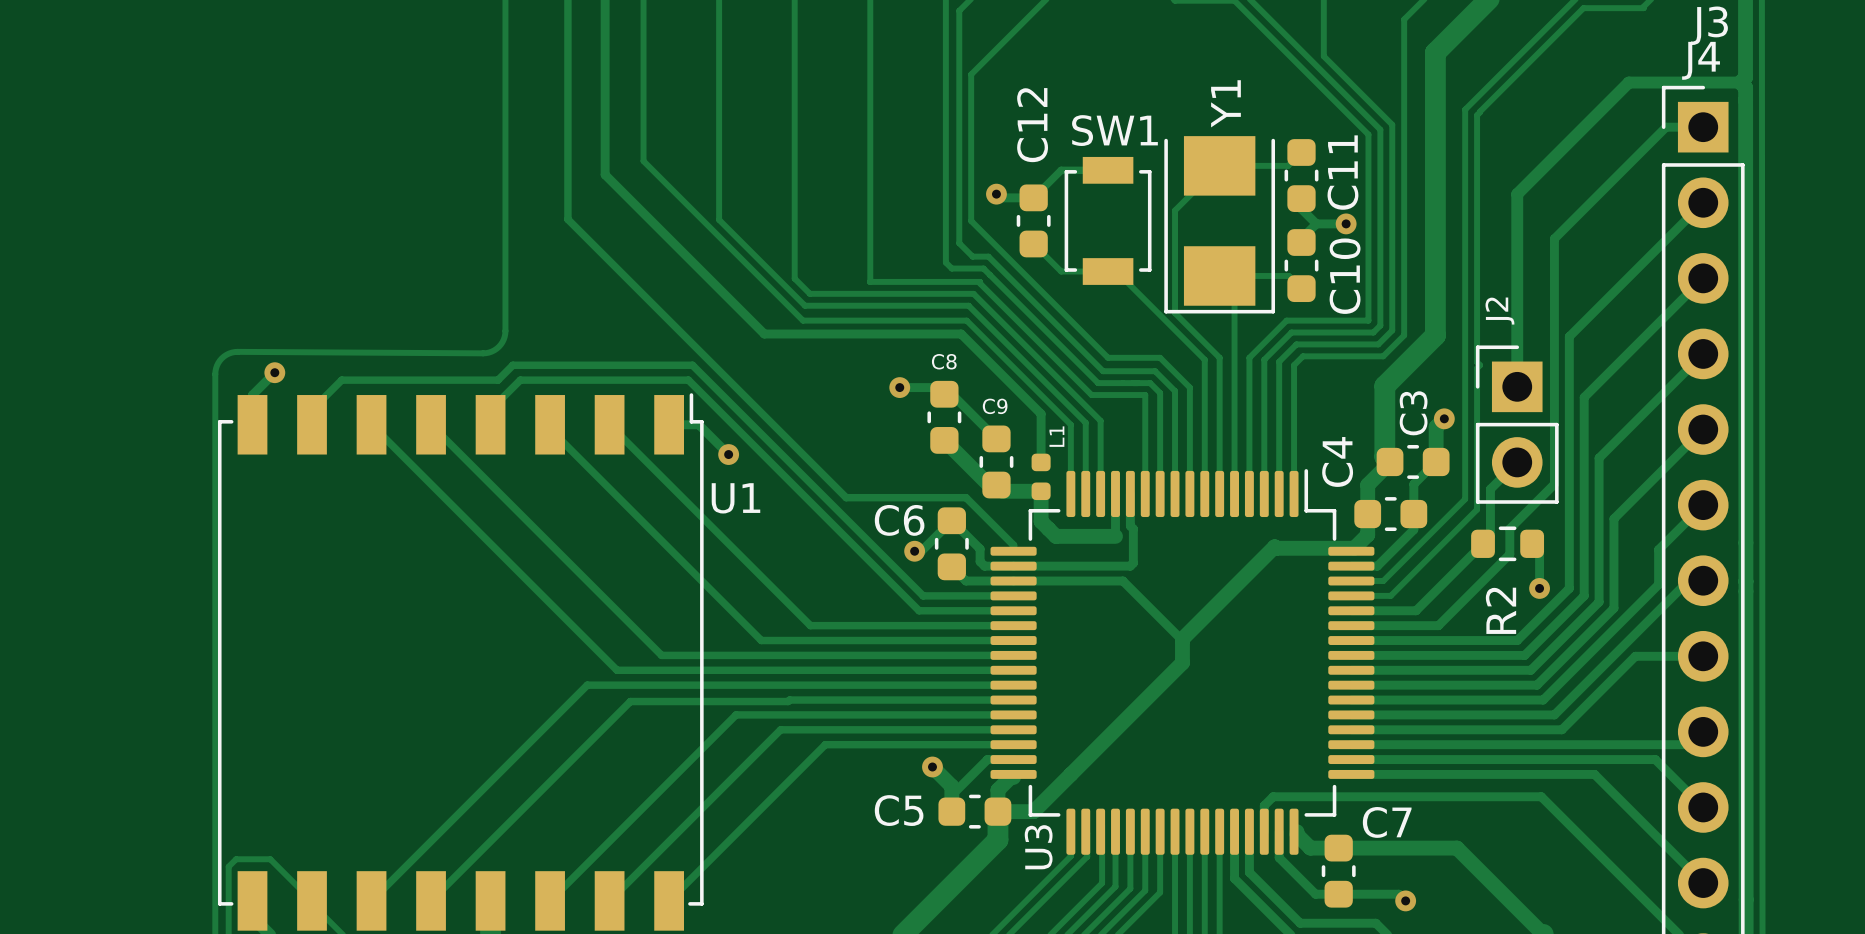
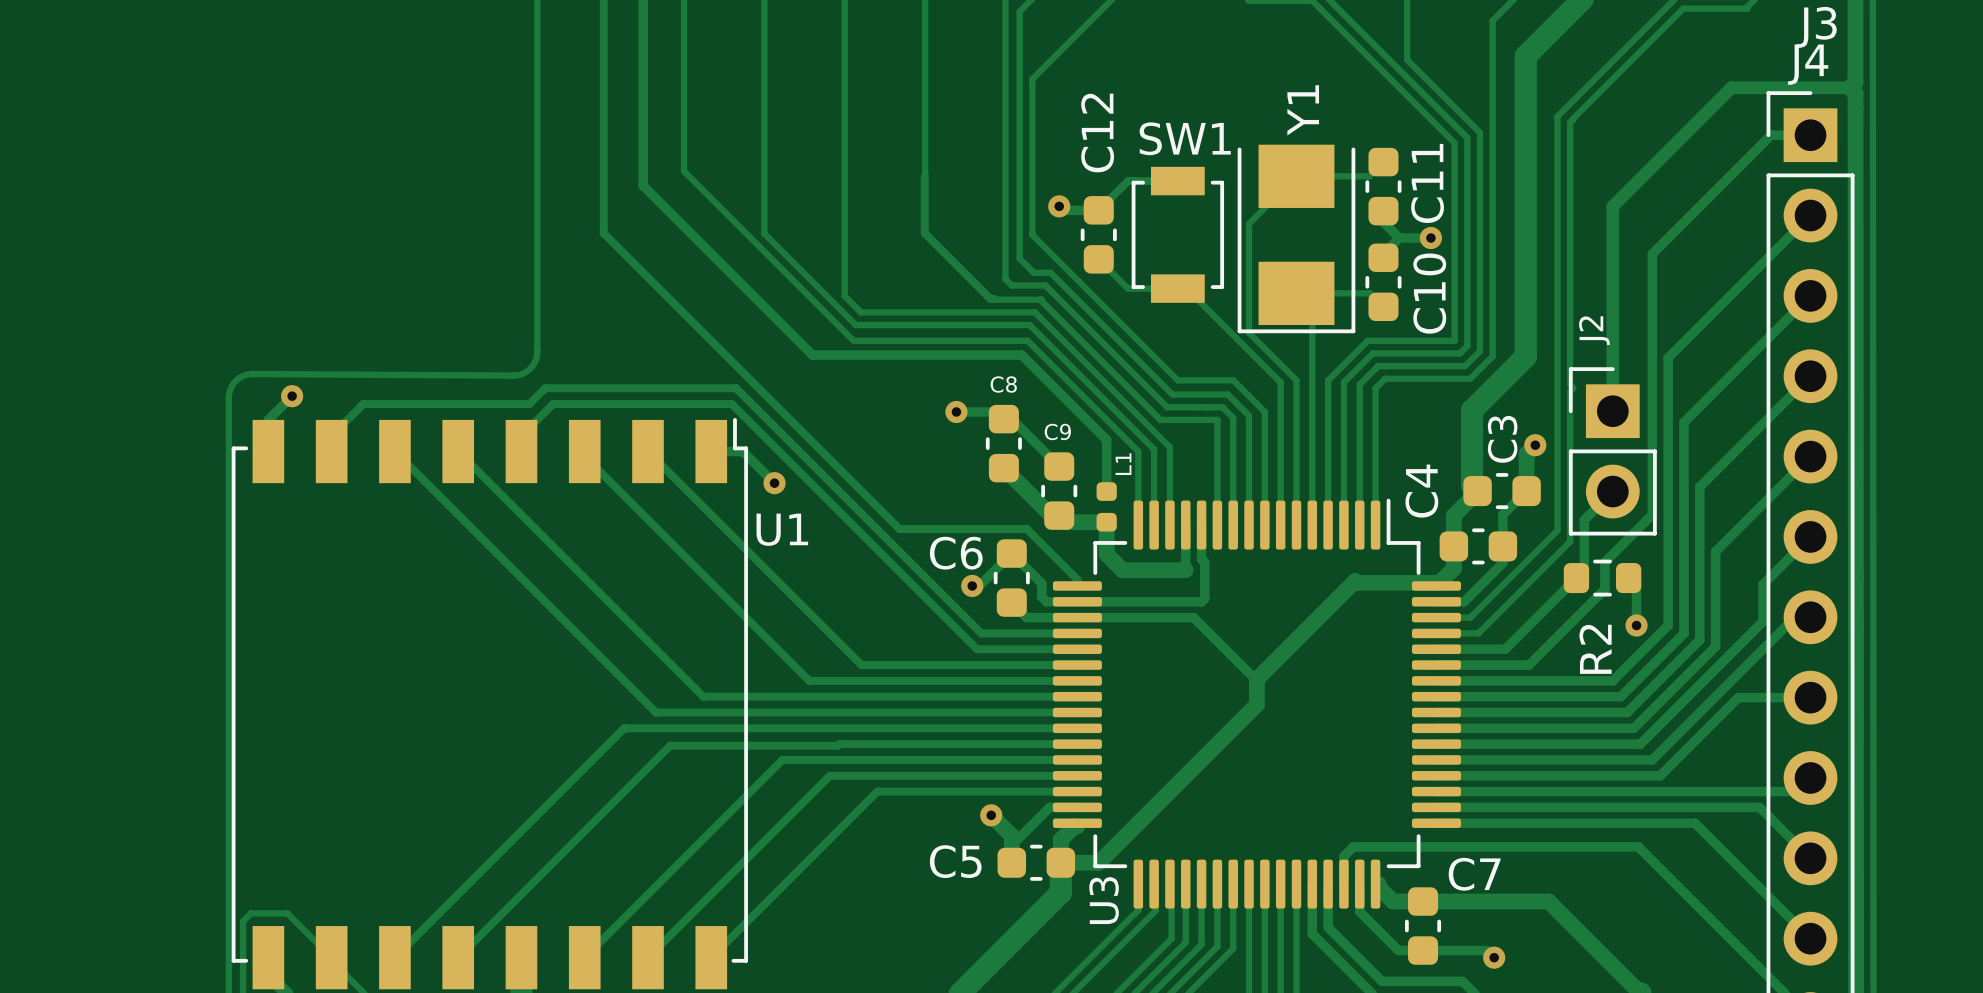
track: (870, 165) (870, 281) -> (924, 176) (924, 233) (990, 298) (995, 299)
track: (869, 281) (936, 281) -> none

